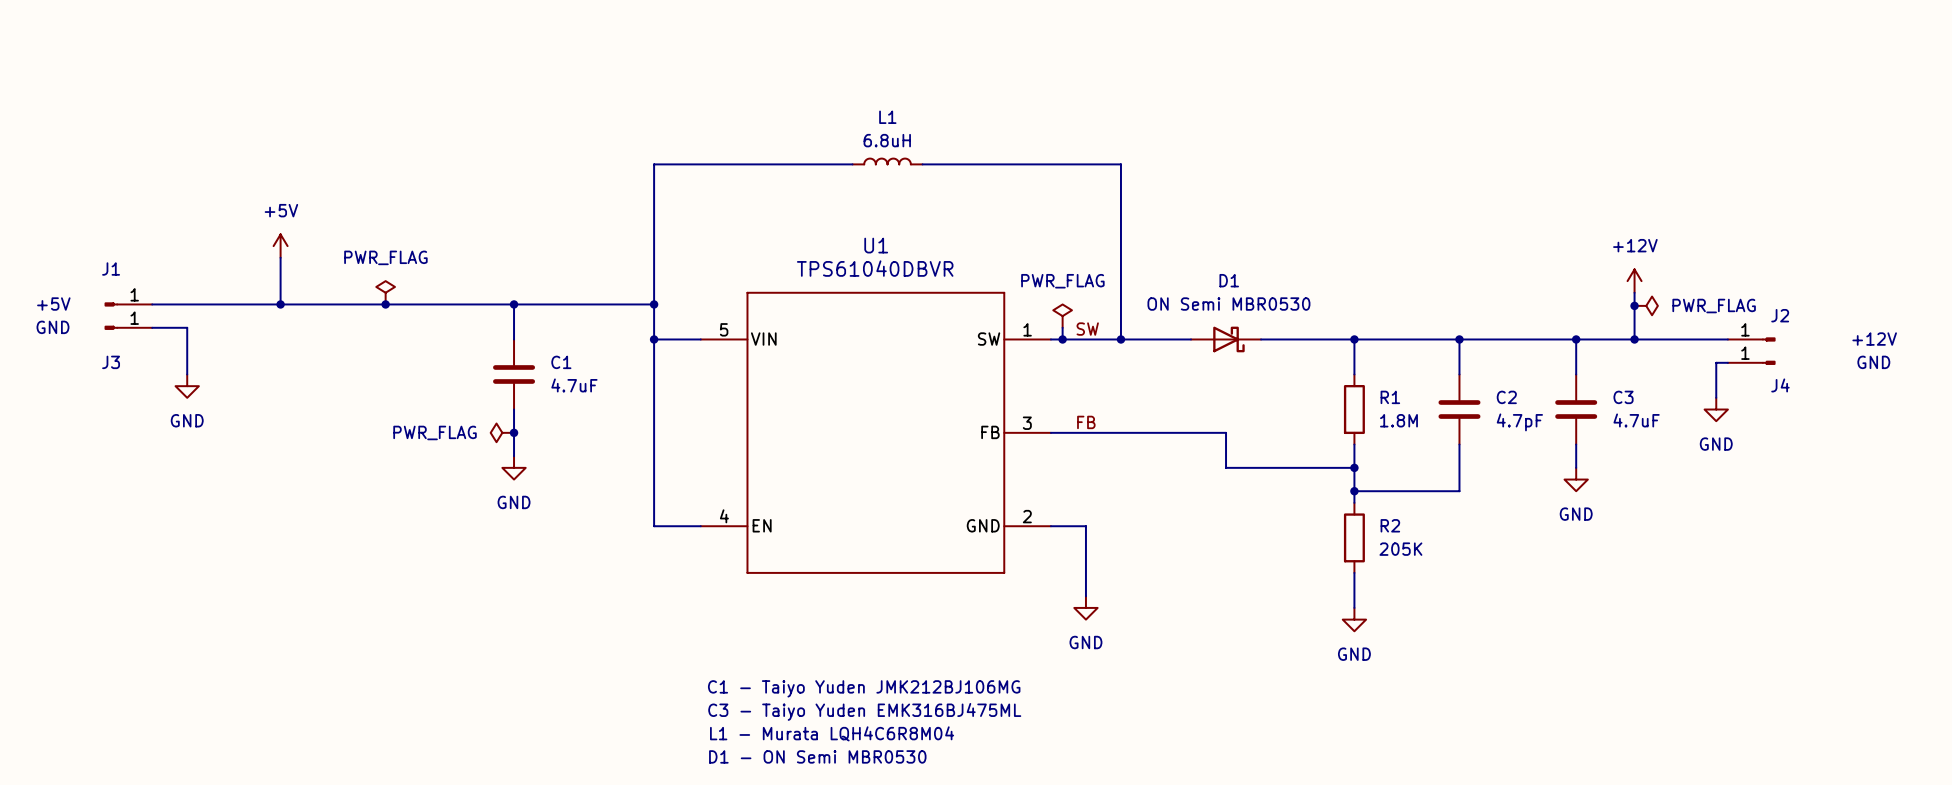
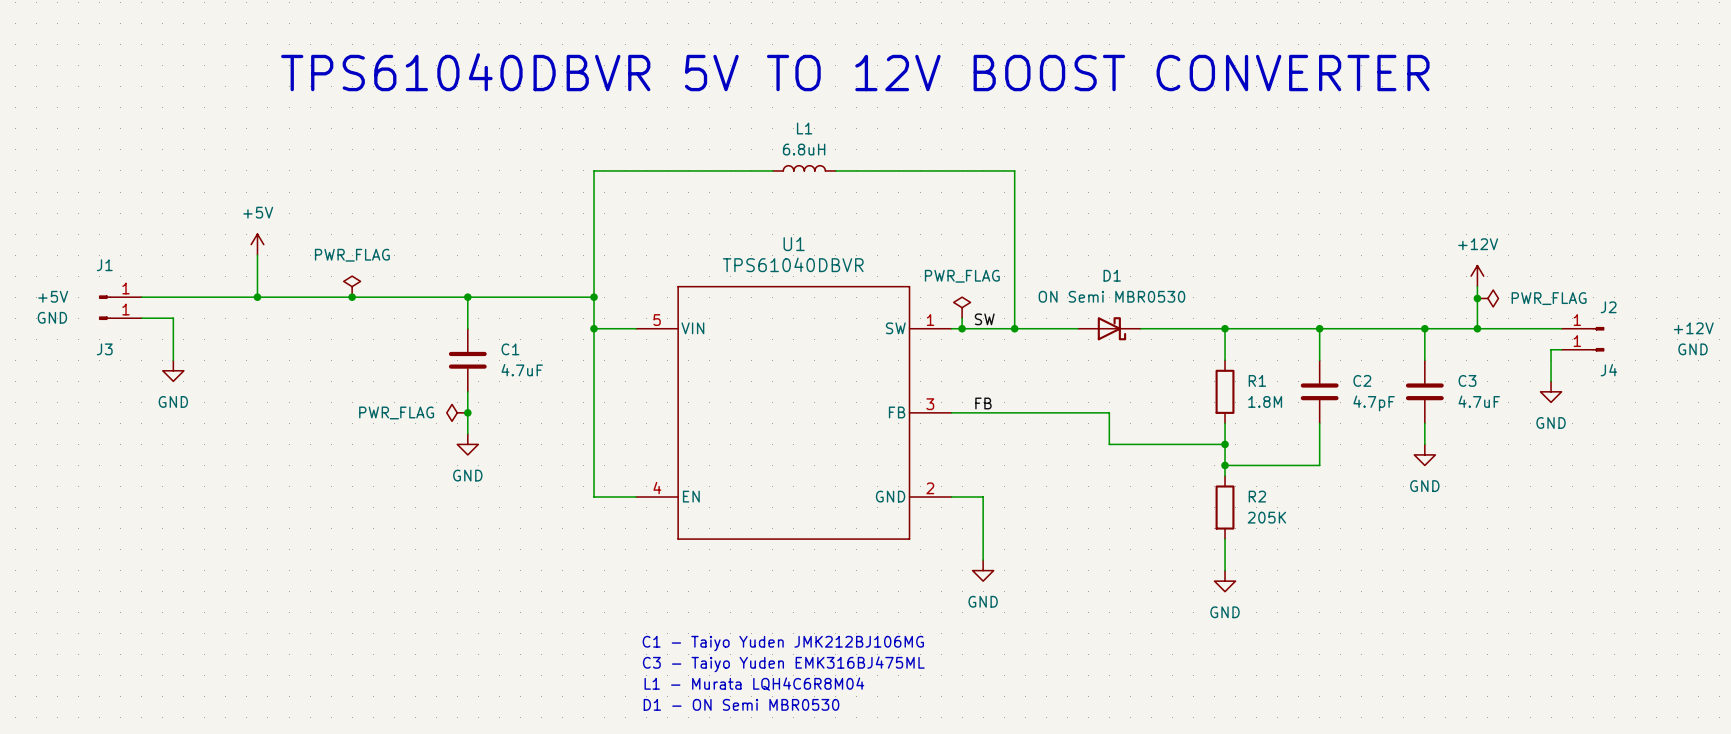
text: none -> TPS61040DBVR 5V TO 12V BOOST CONVERTER (855, 72)

